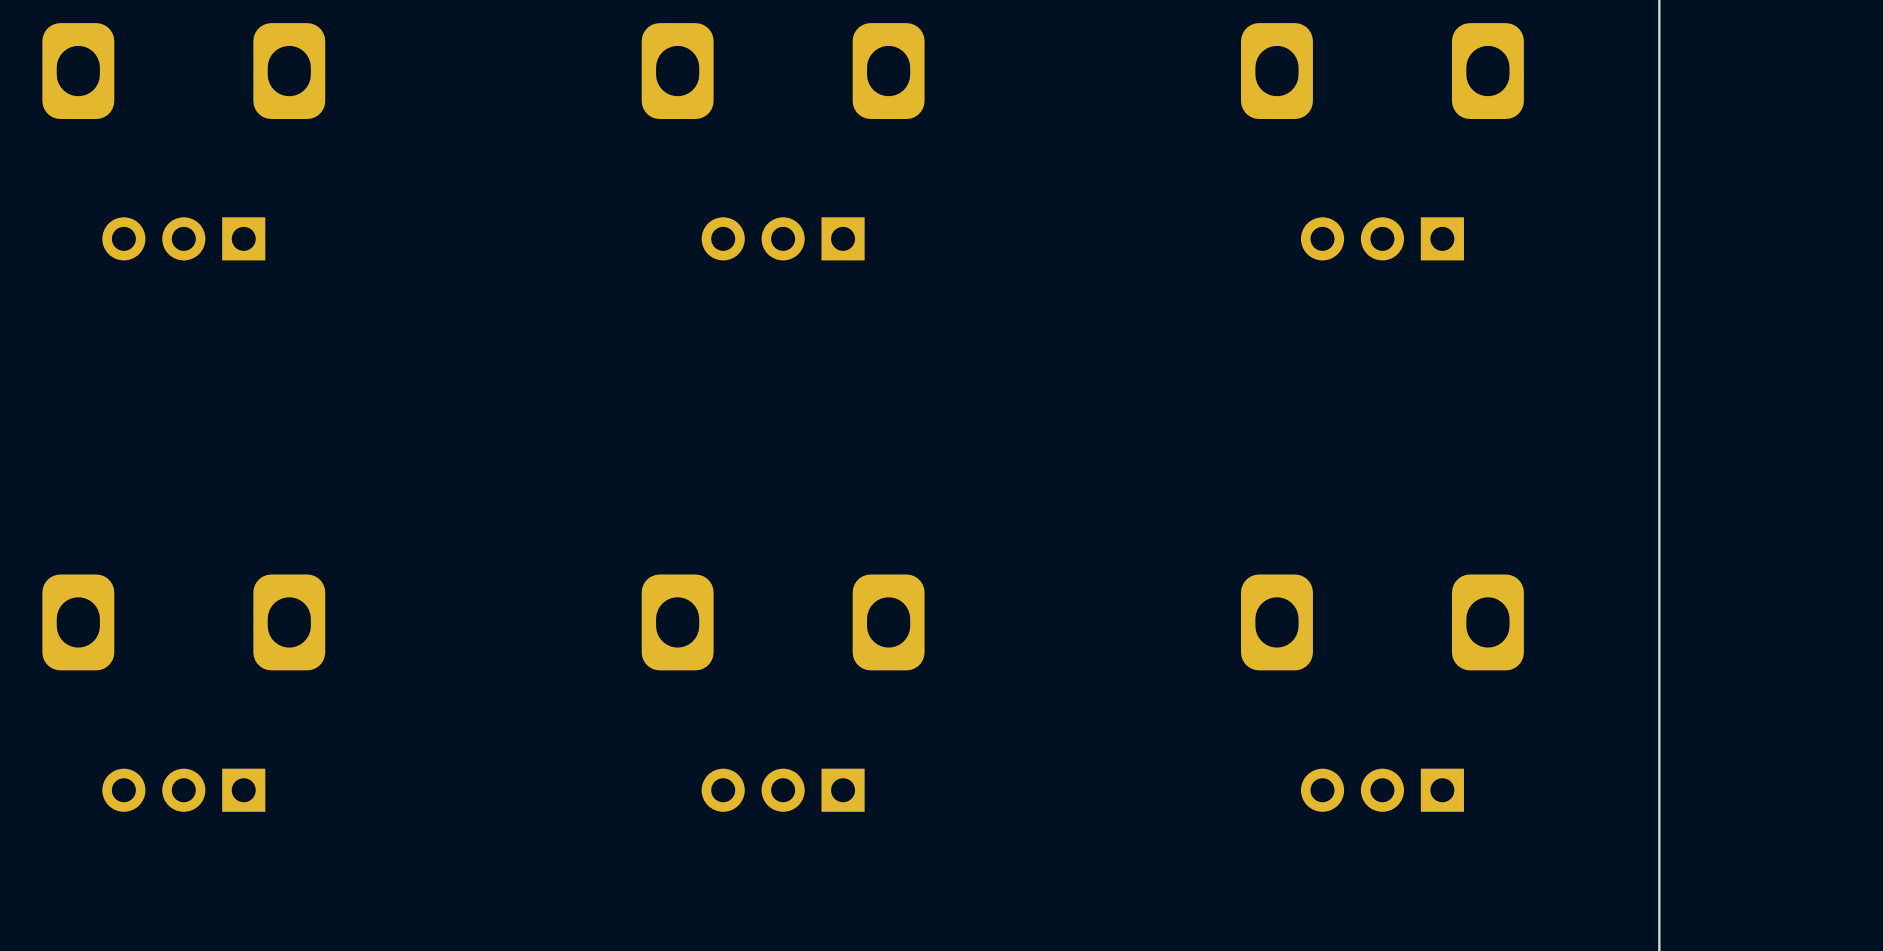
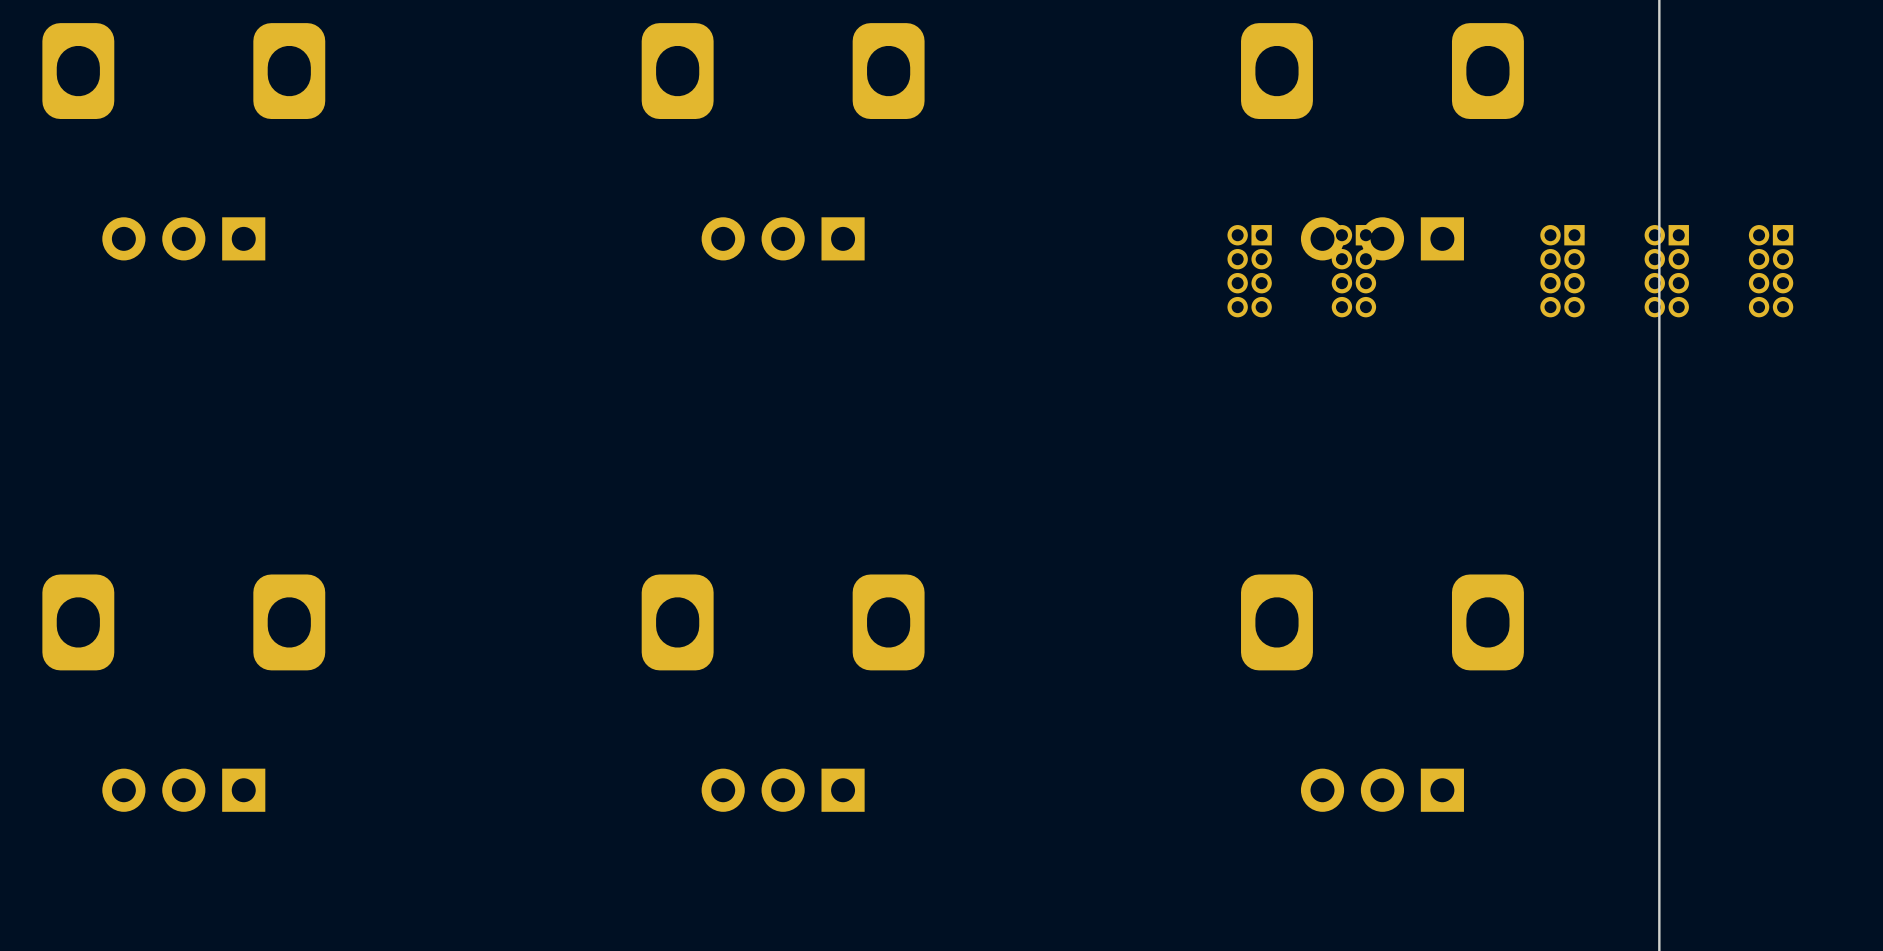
part: none -> (1249, 271)
part: none -> (1353, 271)
part: none -> (1562, 271)
part: none -> (1666, 271)
part: none -> (1771, 271)

